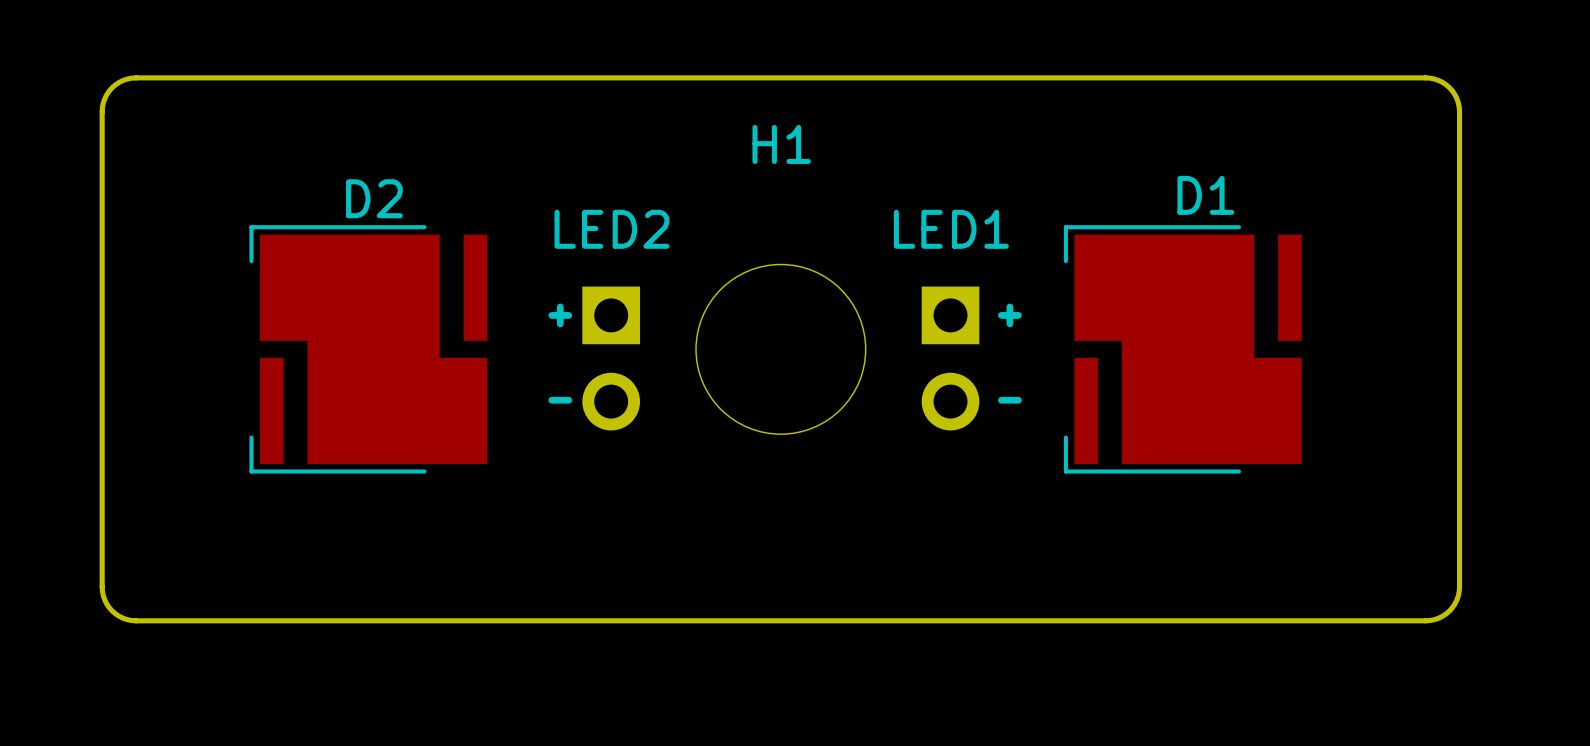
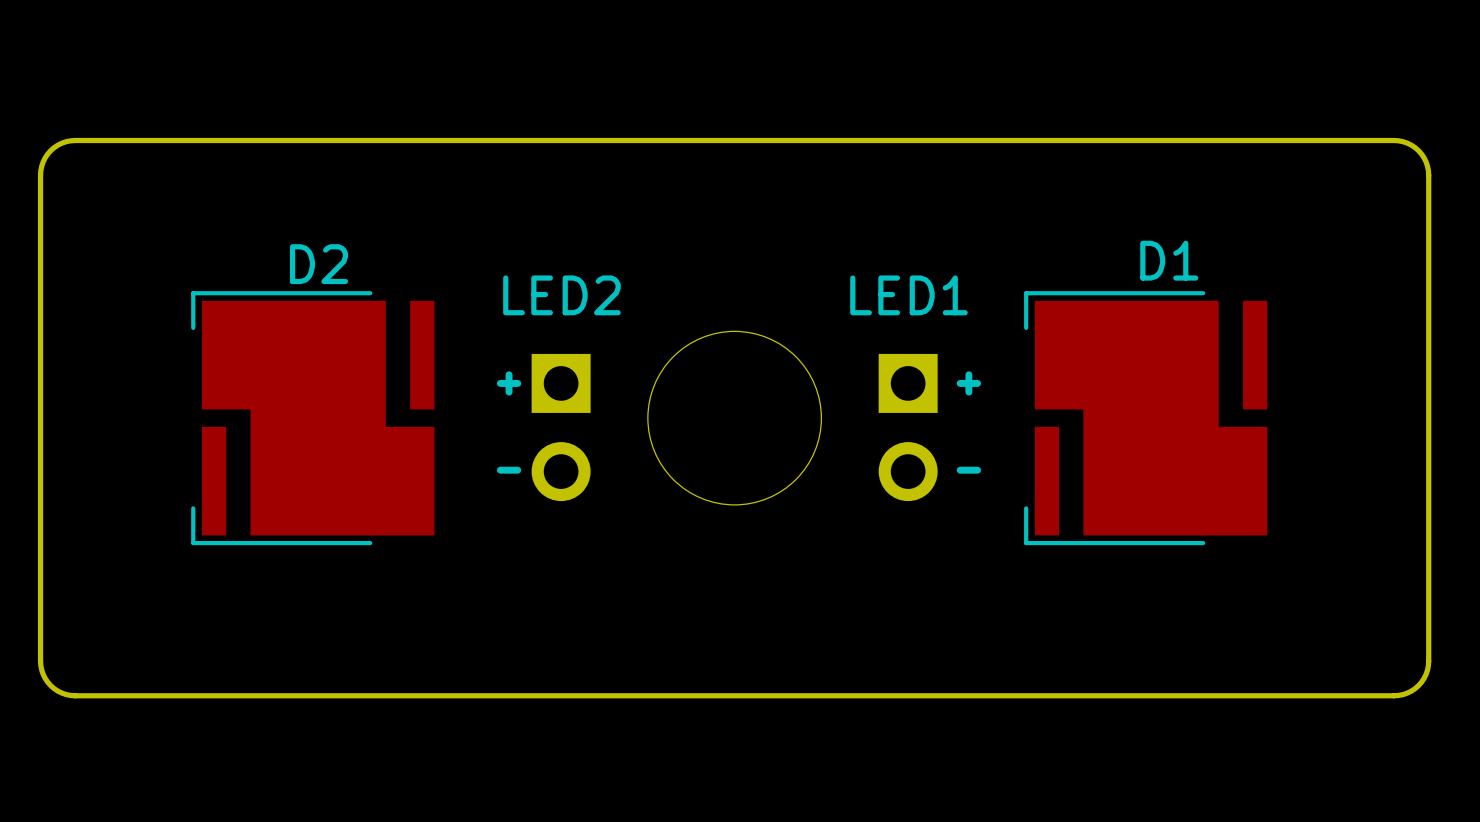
H1 name: H1 (781, 144) -> none

